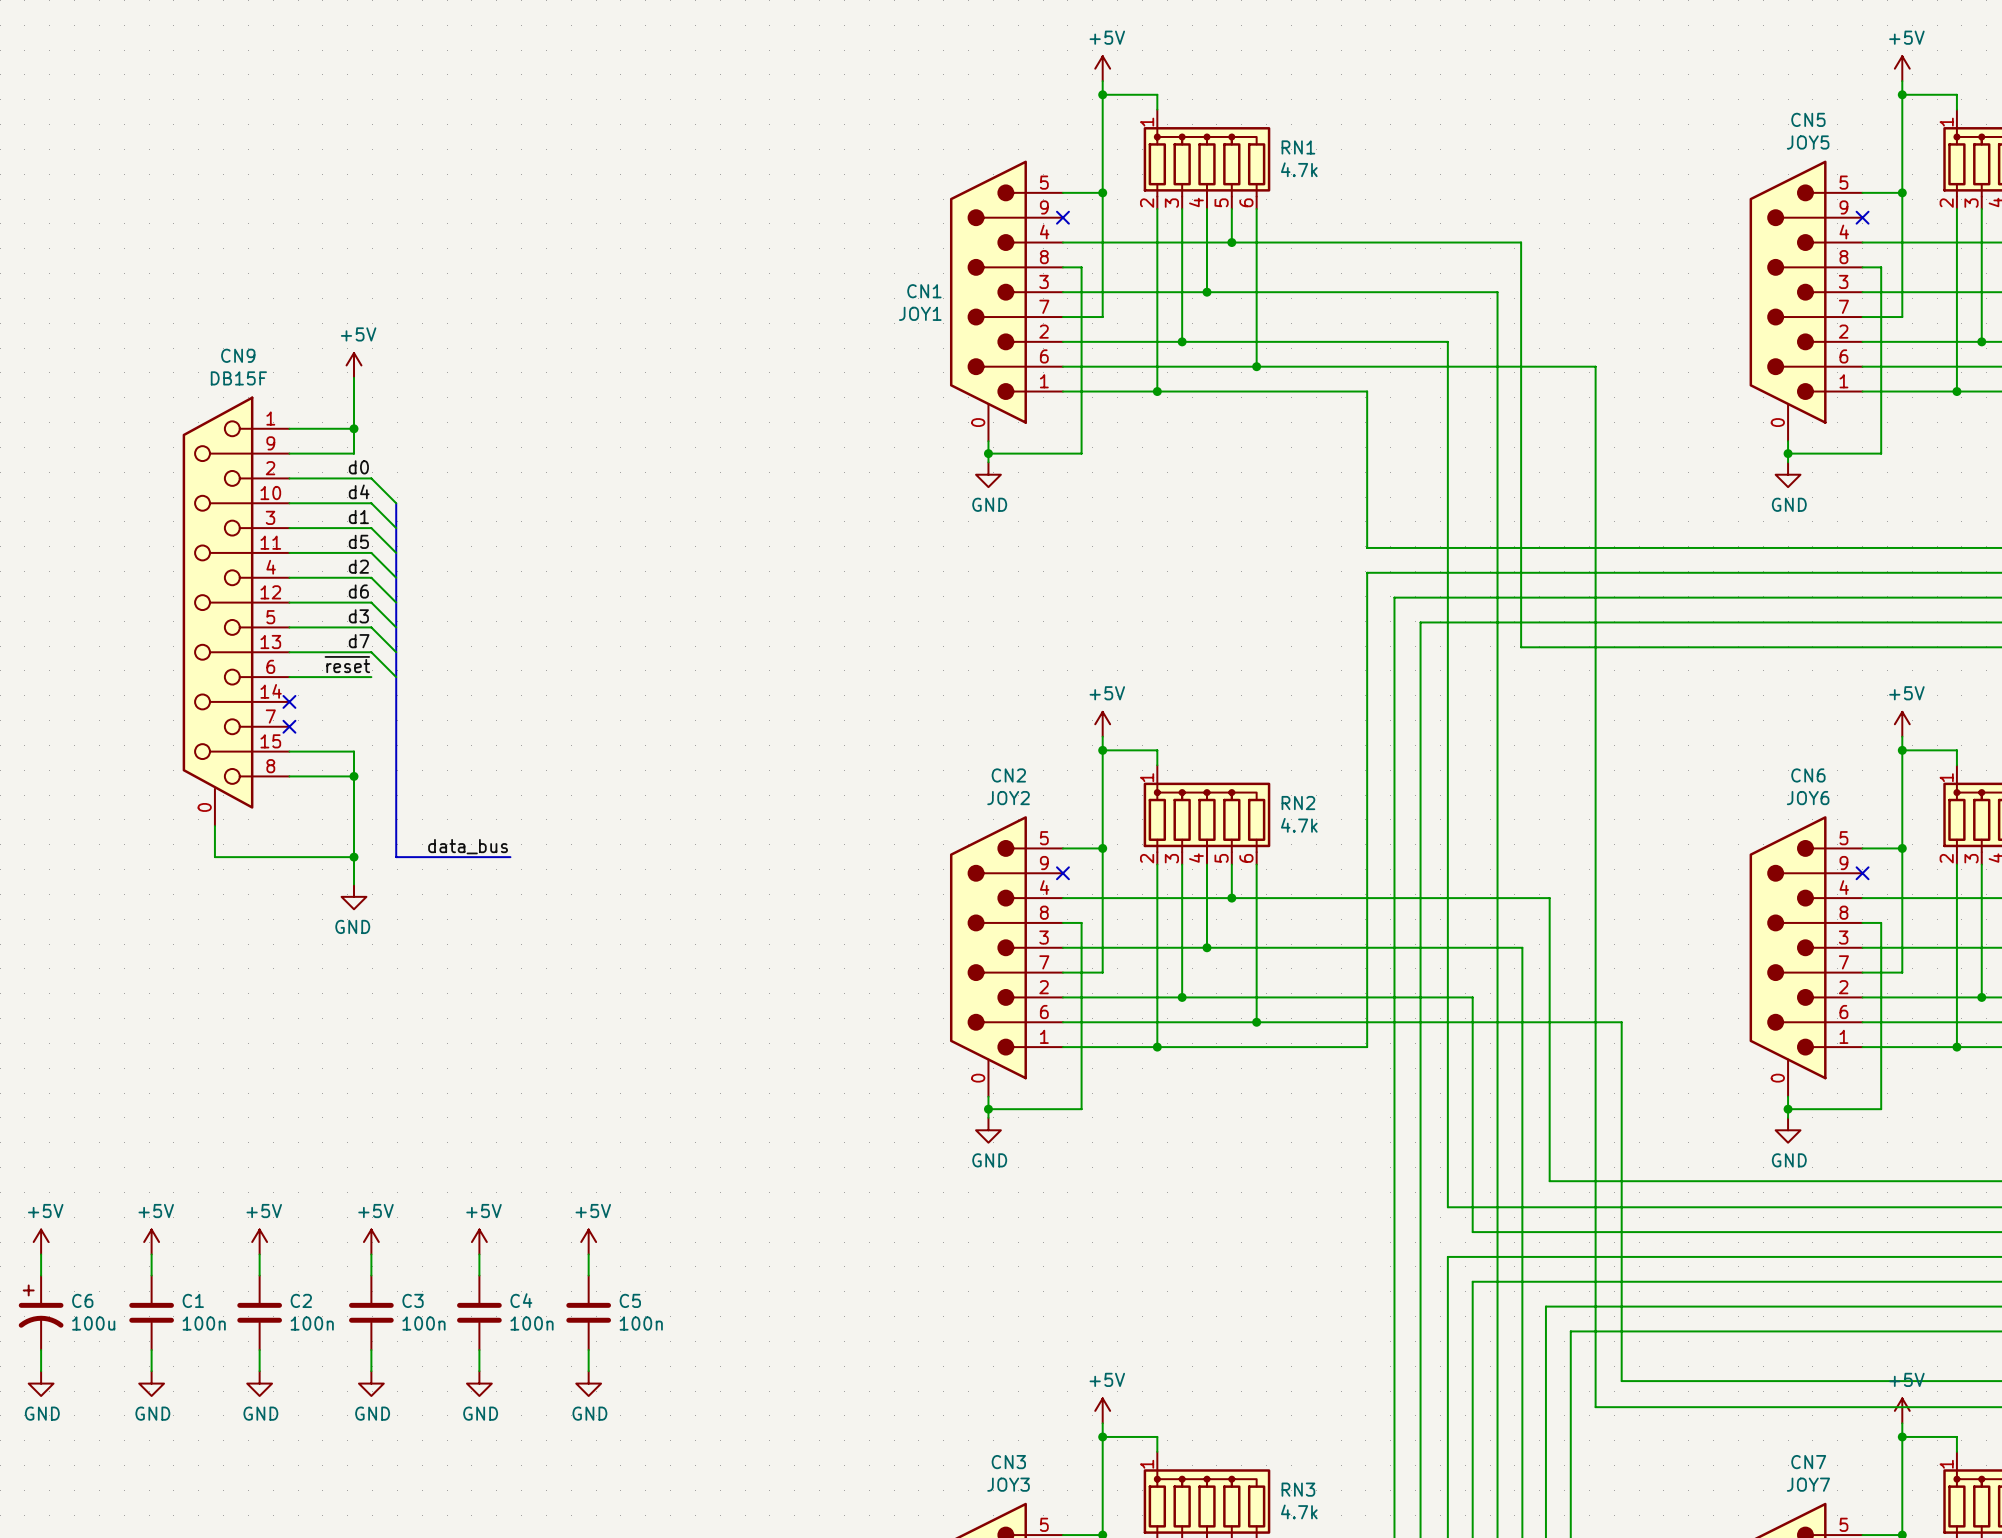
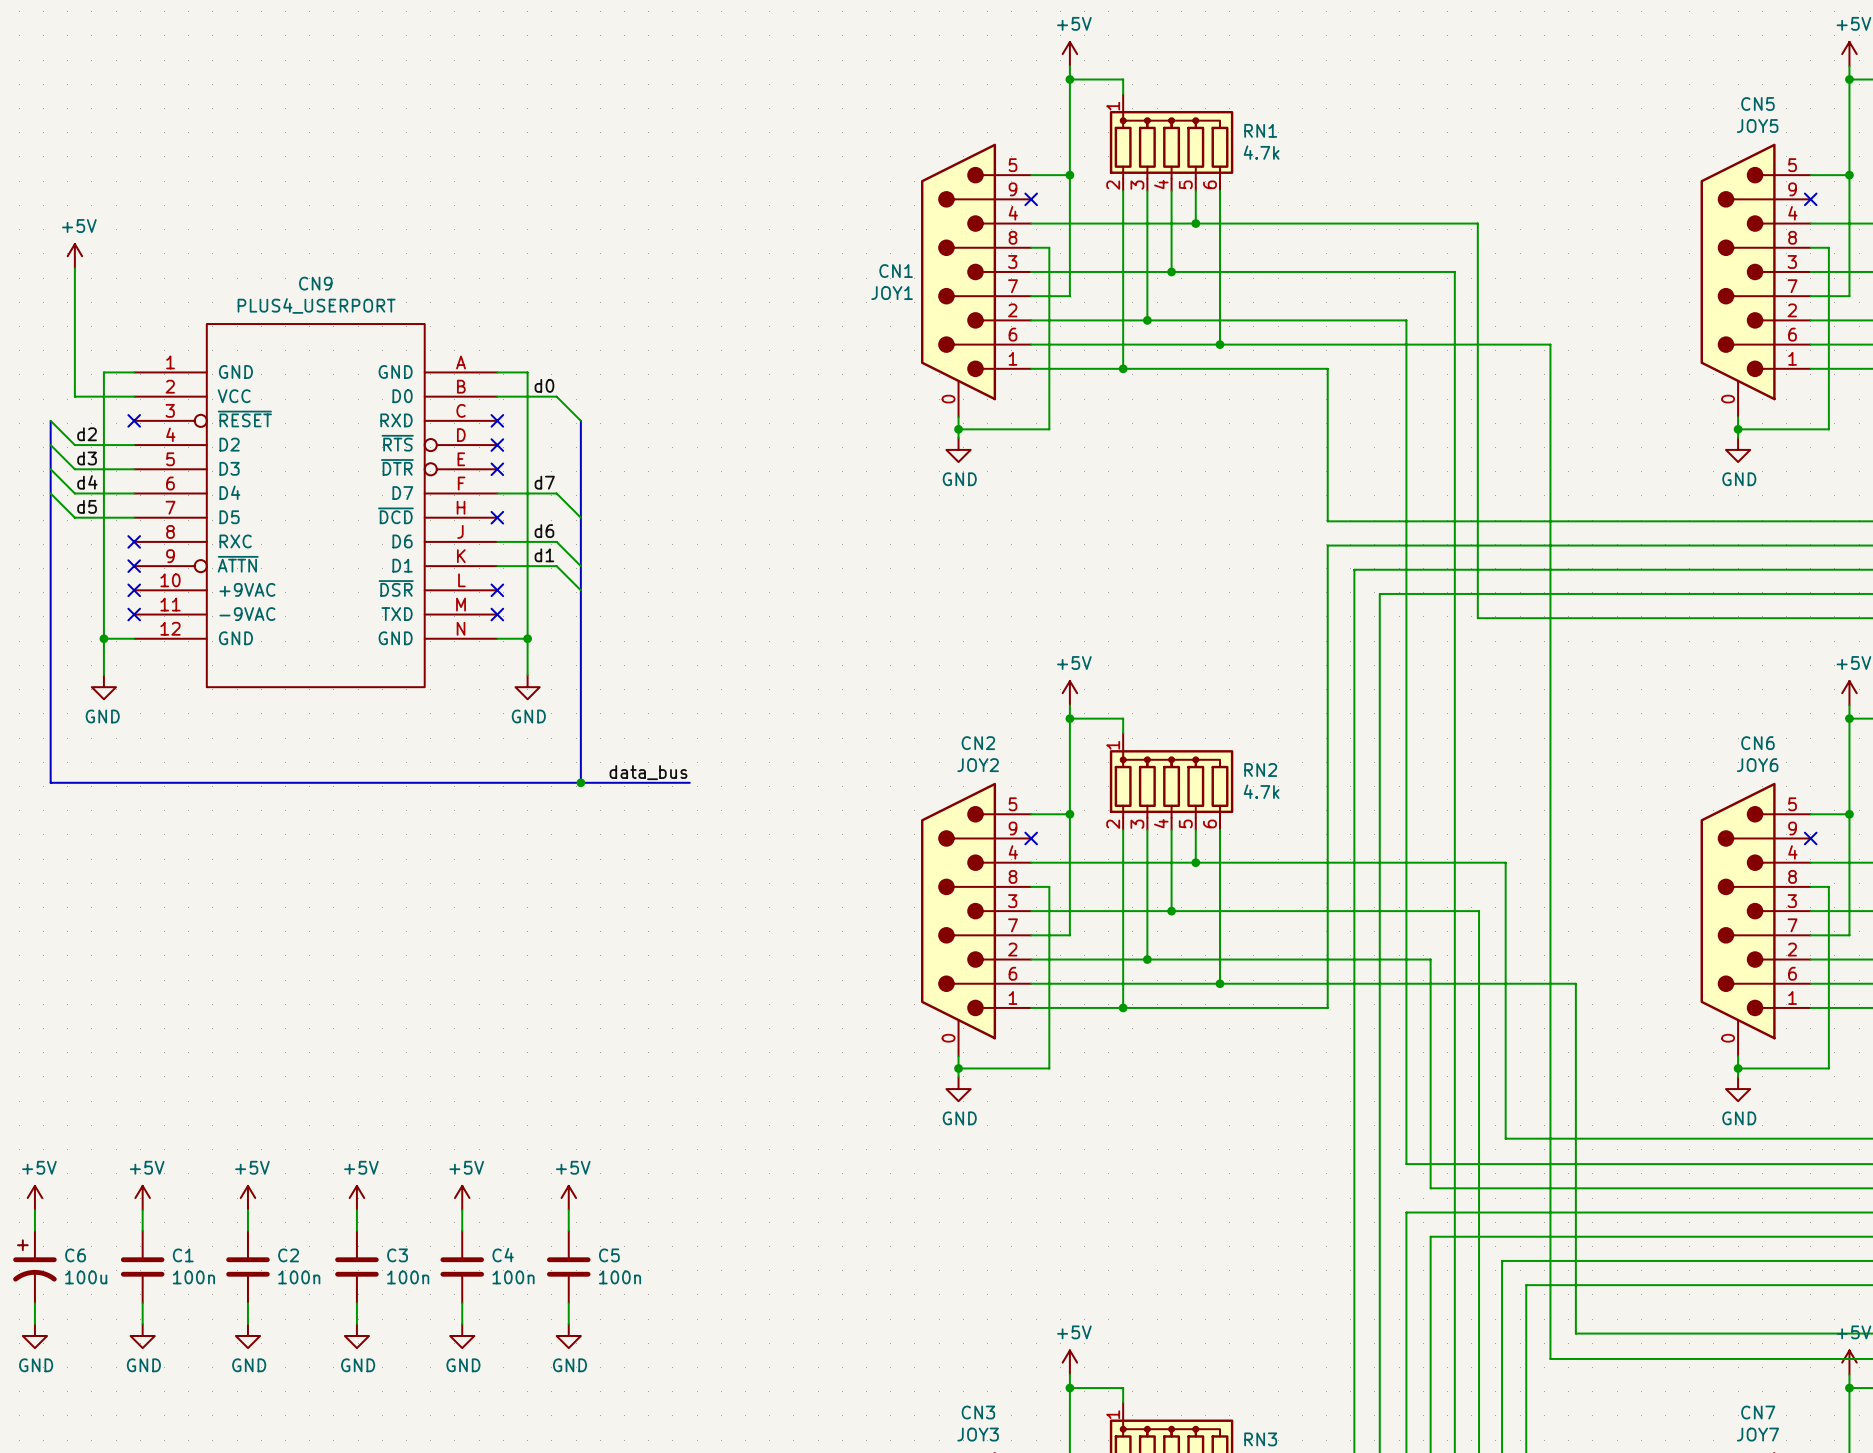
power symbol: none -> +5V (74, 256)
wire: none -> (74, 268) (74, 396) (134, 396)
CN9 name position: CN9 (238, 355) -> CN9 (315, 283)
power symbol: +5V (354, 365) -> none
wire: (354, 377) (354, 453) (289, 453) -> none
CN9 value: DB15F (238, 378) -> PLUS4_USERPORT (316, 305)
wire: none -> (134, 372) (103, 372) (103, 675)
wire: none -> (497, 372) (527, 372) (527, 675)
CN9 symbol: [182, 396, 290, 827] -> [134, 324, 498, 688]
wire: none -> (497, 396) (556, 396) (580, 420)
wire: (289, 428) (354, 428) -> none
junction: (354, 428) -> none
wire: none -> (50, 420) (74, 445) (134, 445)
bus: none -> (50, 420) (50, 782) (689, 782)
no-connect mark: none -> (134, 420)
no-connect mark: none -> (497, 420)
bus: none -> (580, 420) (580, 782)
label: none -> d2 (87, 434)
label position: d0 (358, 467) -> d0 (544, 385)
wire: none -> (50, 445) (74, 469) (134, 469)
no-connect mark: none -> (497, 445)
wire: (289, 478) (371, 478) (396, 503) -> none
label: none -> d3 (87, 458)
label: d4 (359, 491) -> none
wire: none -> (50, 469) (74, 493) (134, 493)
no-connect mark: none -> (497, 469)
wire: (289, 503) (371, 503) (396, 528) -> none
bus: (396, 503) (396, 857) (510, 857) -> none
label: none -> d4 (87, 482)
label position: d1 (358, 517) -> d1 (544, 555)
wire: none -> (50, 493) (74, 517) (134, 517)
wire: none -> (497, 493) (556, 493) (580, 517)
wire: (289, 528) (371, 528) (396, 552) -> none
label: none -> d5 (87, 506)
label: d5 (358, 541) -> none
no-connect mark: none -> (497, 517)
wire: (289, 552) (371, 552) (396, 577) -> none
label: d2 (358, 566) -> none
no-connect mark: none -> (134, 541)
wire: none -> (497, 541) (556, 541) (580, 566)
wire: (289, 577) (371, 577) (396, 602) -> none
label position: d6 (358, 591) -> d6 (544, 531)
no-connect mark: none -> (134, 566)
wire: none -> (497, 566) (556, 566) (580, 590)
wire: (289, 602) (371, 602) (396, 627) -> none
label: d3 (358, 616) -> none
no-connect mark: none -> (134, 590)
no-connect mark: none -> (497, 590)
wire: (289, 627) (371, 627) (396, 652) -> none
label position: d7 (359, 641) -> d7 (544, 482)
no-connect mark: none -> (134, 614)
no-connect mark: none -> (497, 614)
wire: (289, 652) (371, 652) (396, 677) -> none
label: ~{reset} (347, 664) -> none
wire: none -> (103, 638) (134, 638)
junction: none -> (103, 638)
wire: none -> (497, 638) (527, 638)
junction: none -> (527, 638)
wire: (289, 677) (371, 677) -> none
no-connect mark: (289, 701) -> none
power symbol: none -> GND (103, 687)
power symbol: none -> GND (527, 687)
no-connect mark: (289, 726) -> none
wire: (289, 751) (354, 751) (354, 884) -> none
wire: (289, 776) (354, 776) -> none
junction: (354, 776) -> none
junction: none -> (580, 782)
wire: (214, 826) (214, 857) (354, 857) -> none
label position: data_bus (468, 846) -> data_bus (648, 772)
junction: (354, 857) -> none
power symbol: GND (354, 896) -> none

